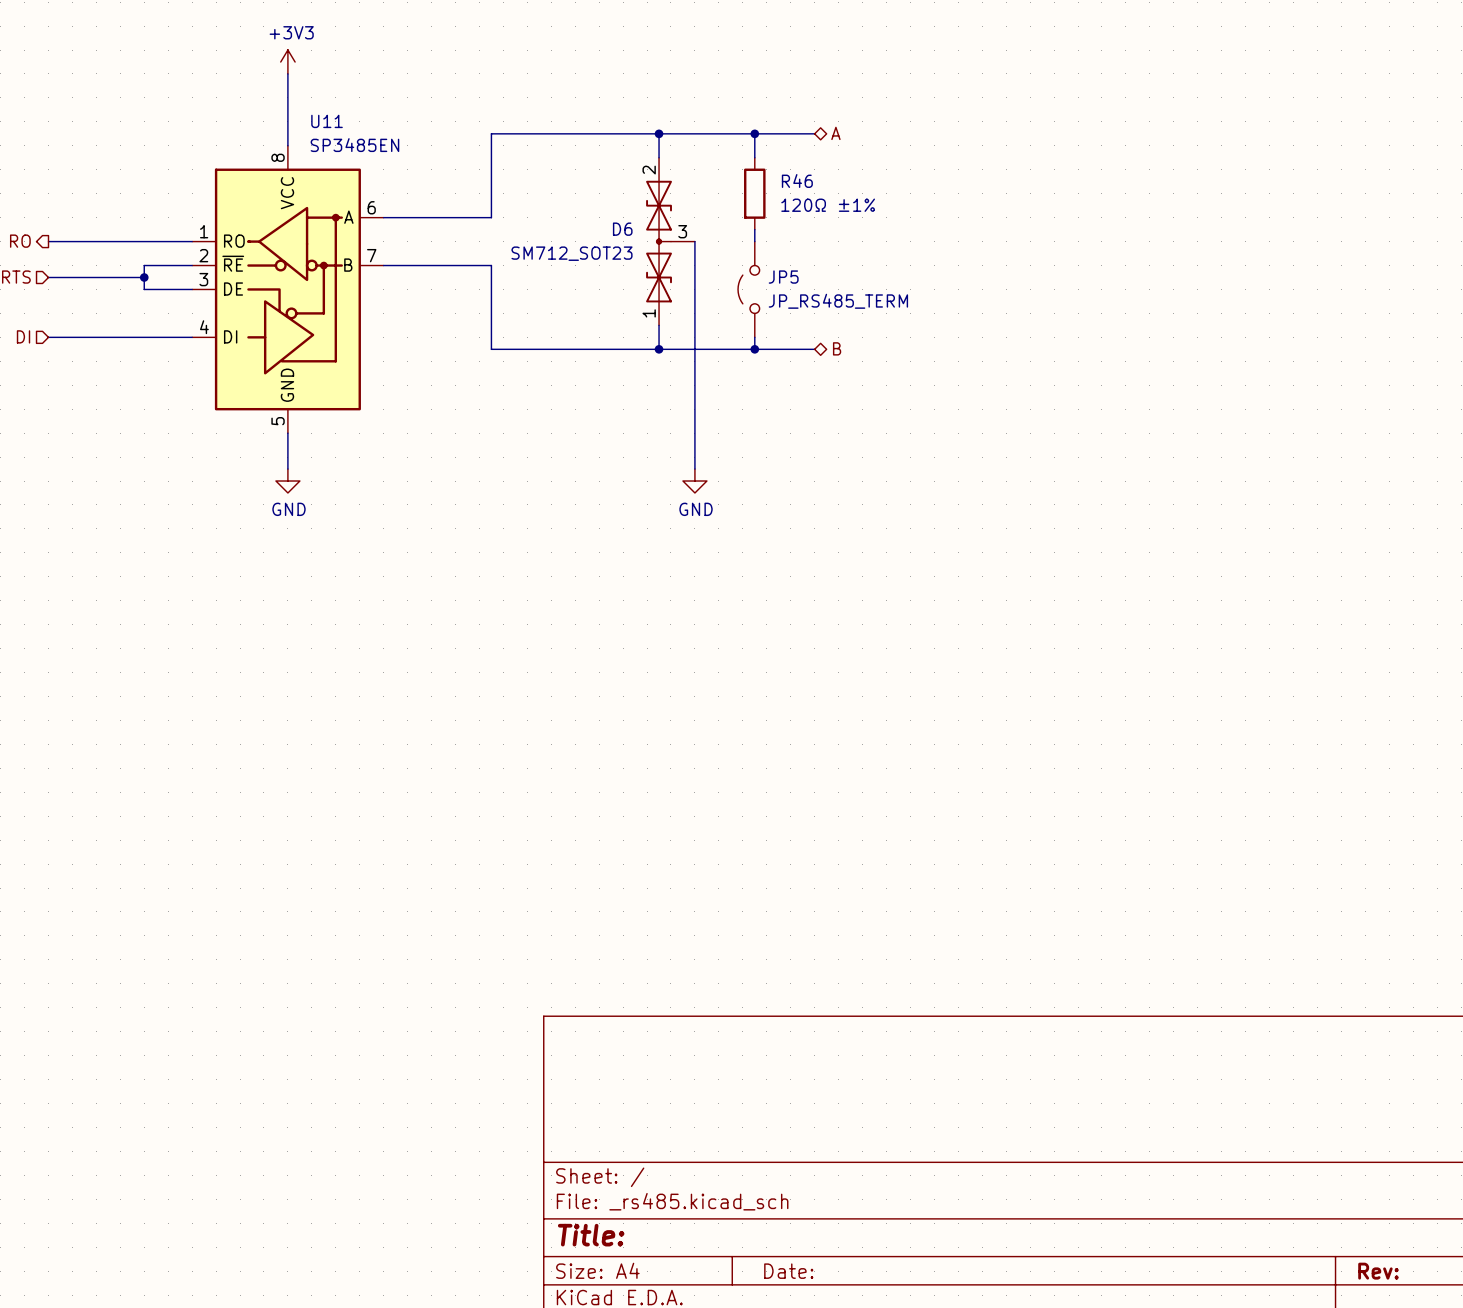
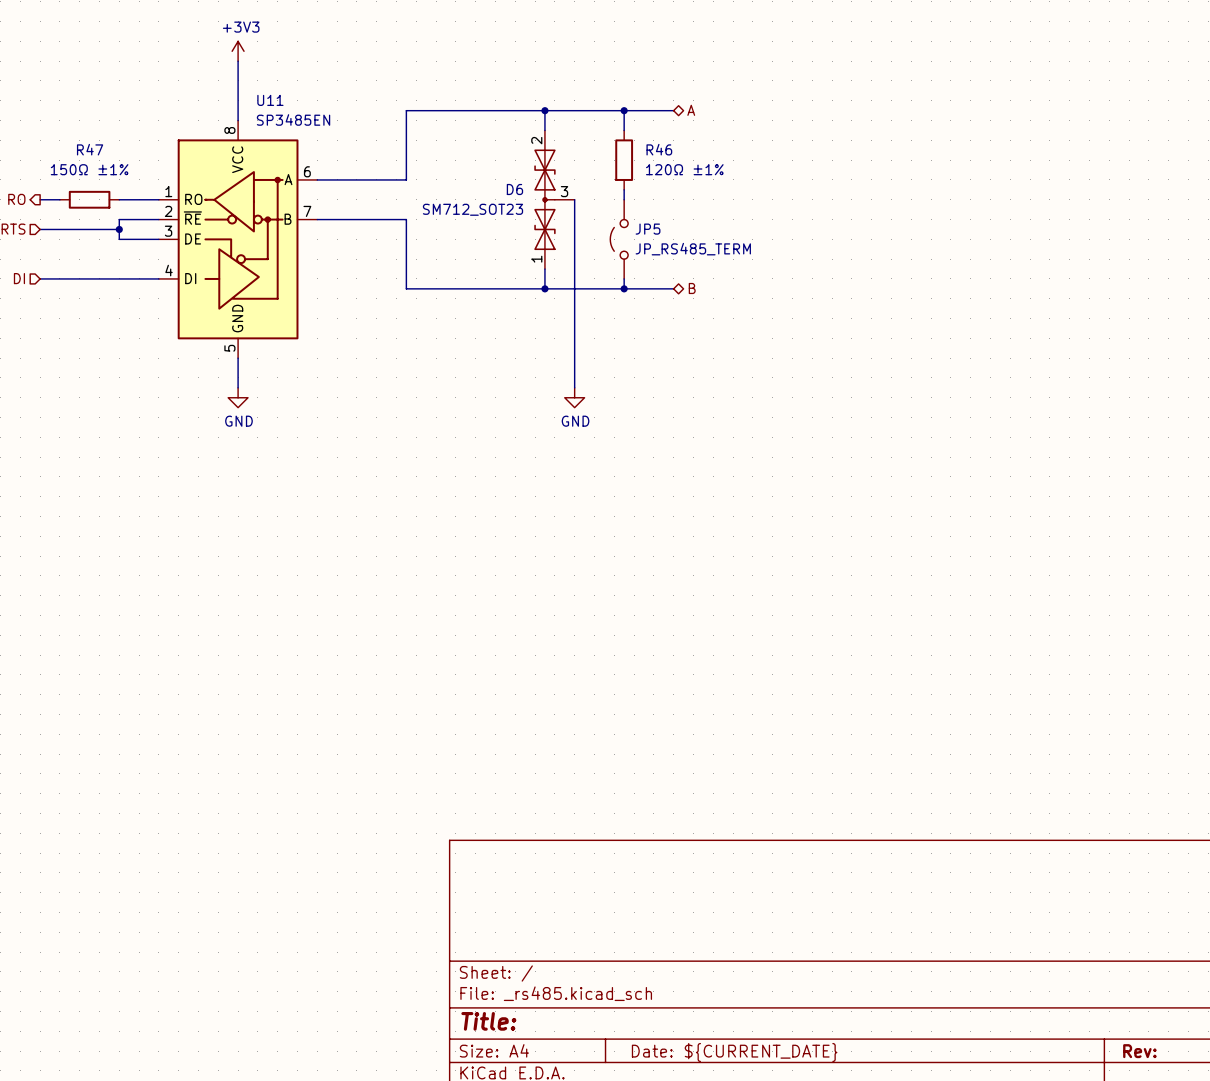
wire: (72, 241) (144, 241) -> none
R47: none -> 150Ω ±1% (89, 199)
title block: Date: (788, 1271) -> Date: ${CURRENT_DATE} (734, 1052)

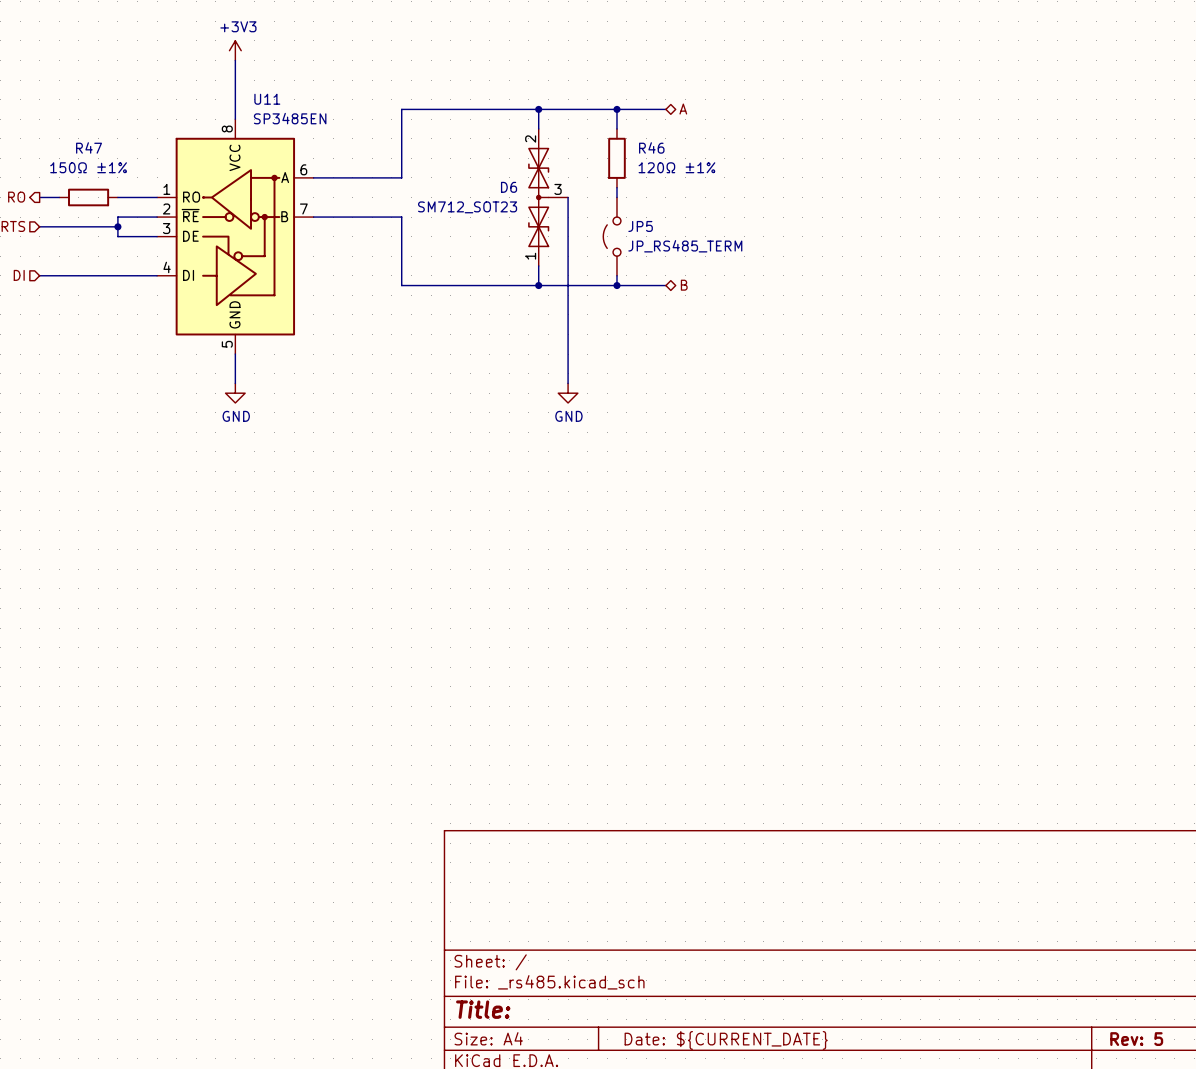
title block: Rev: (1139, 1051) -> Rev: 5 (1136, 1039)

